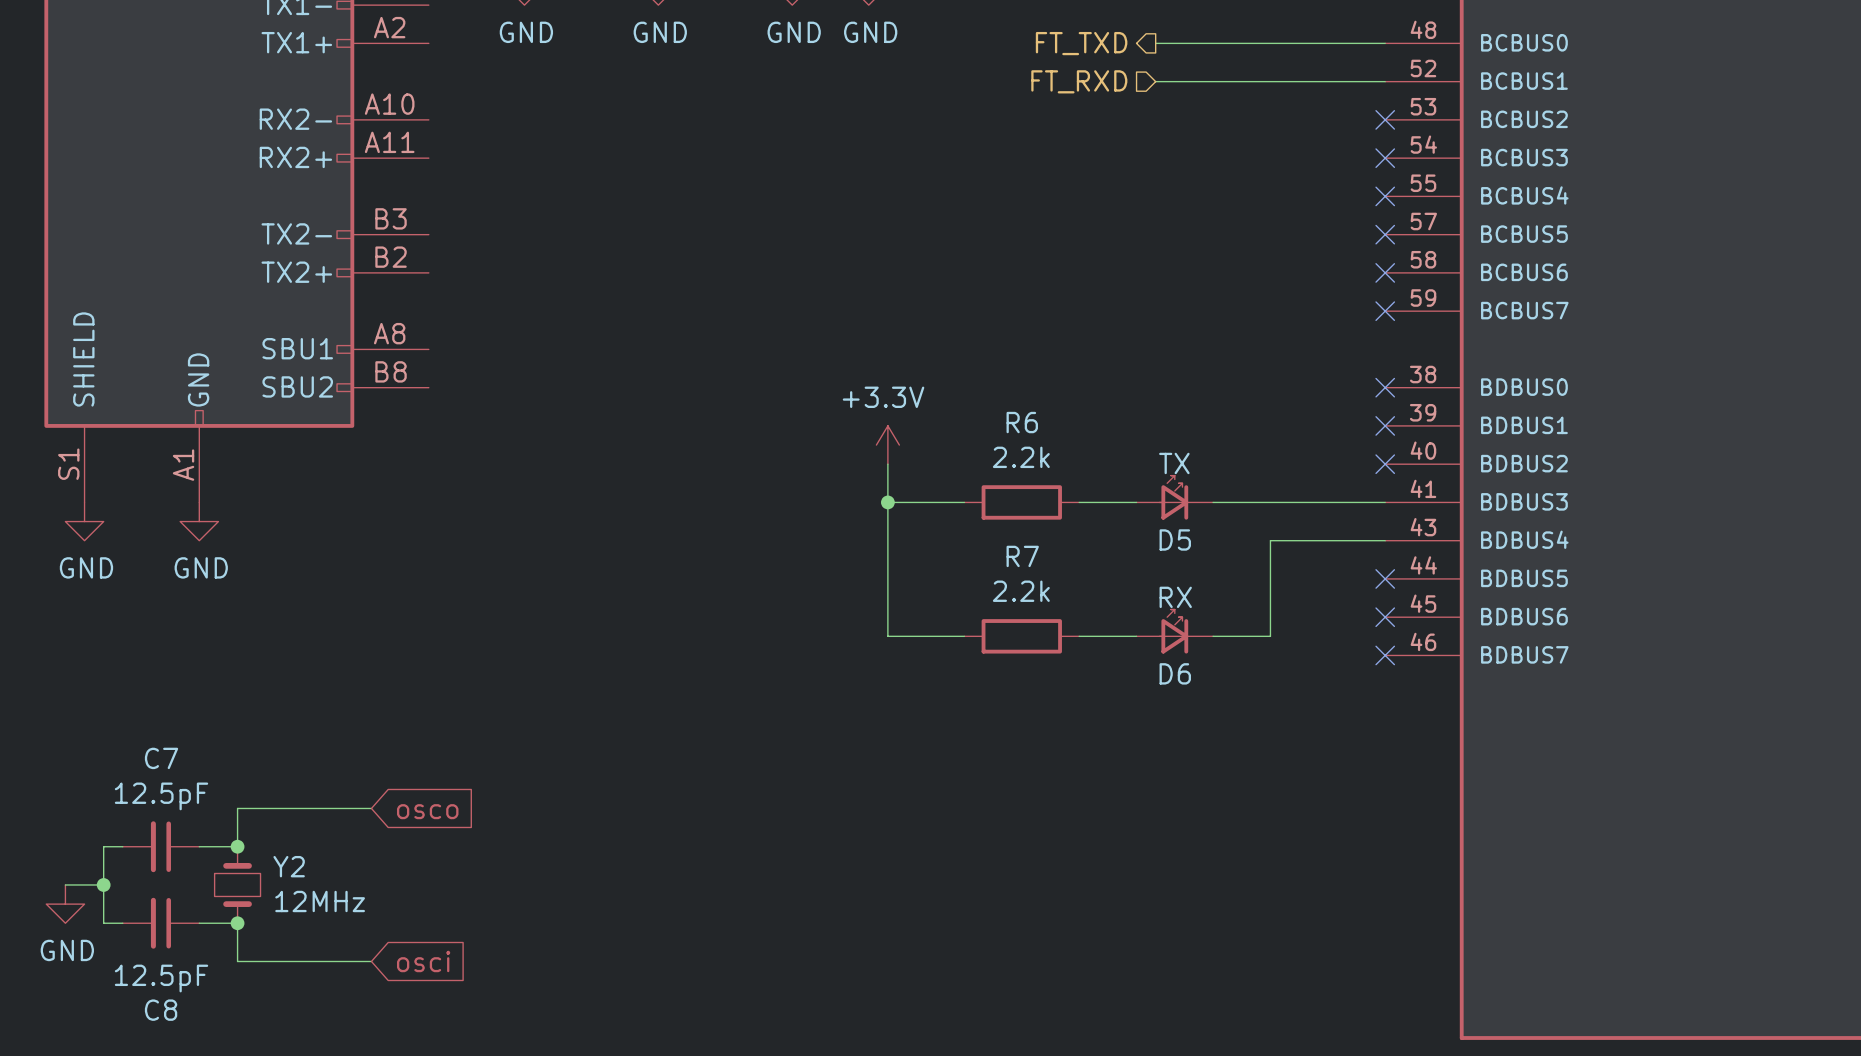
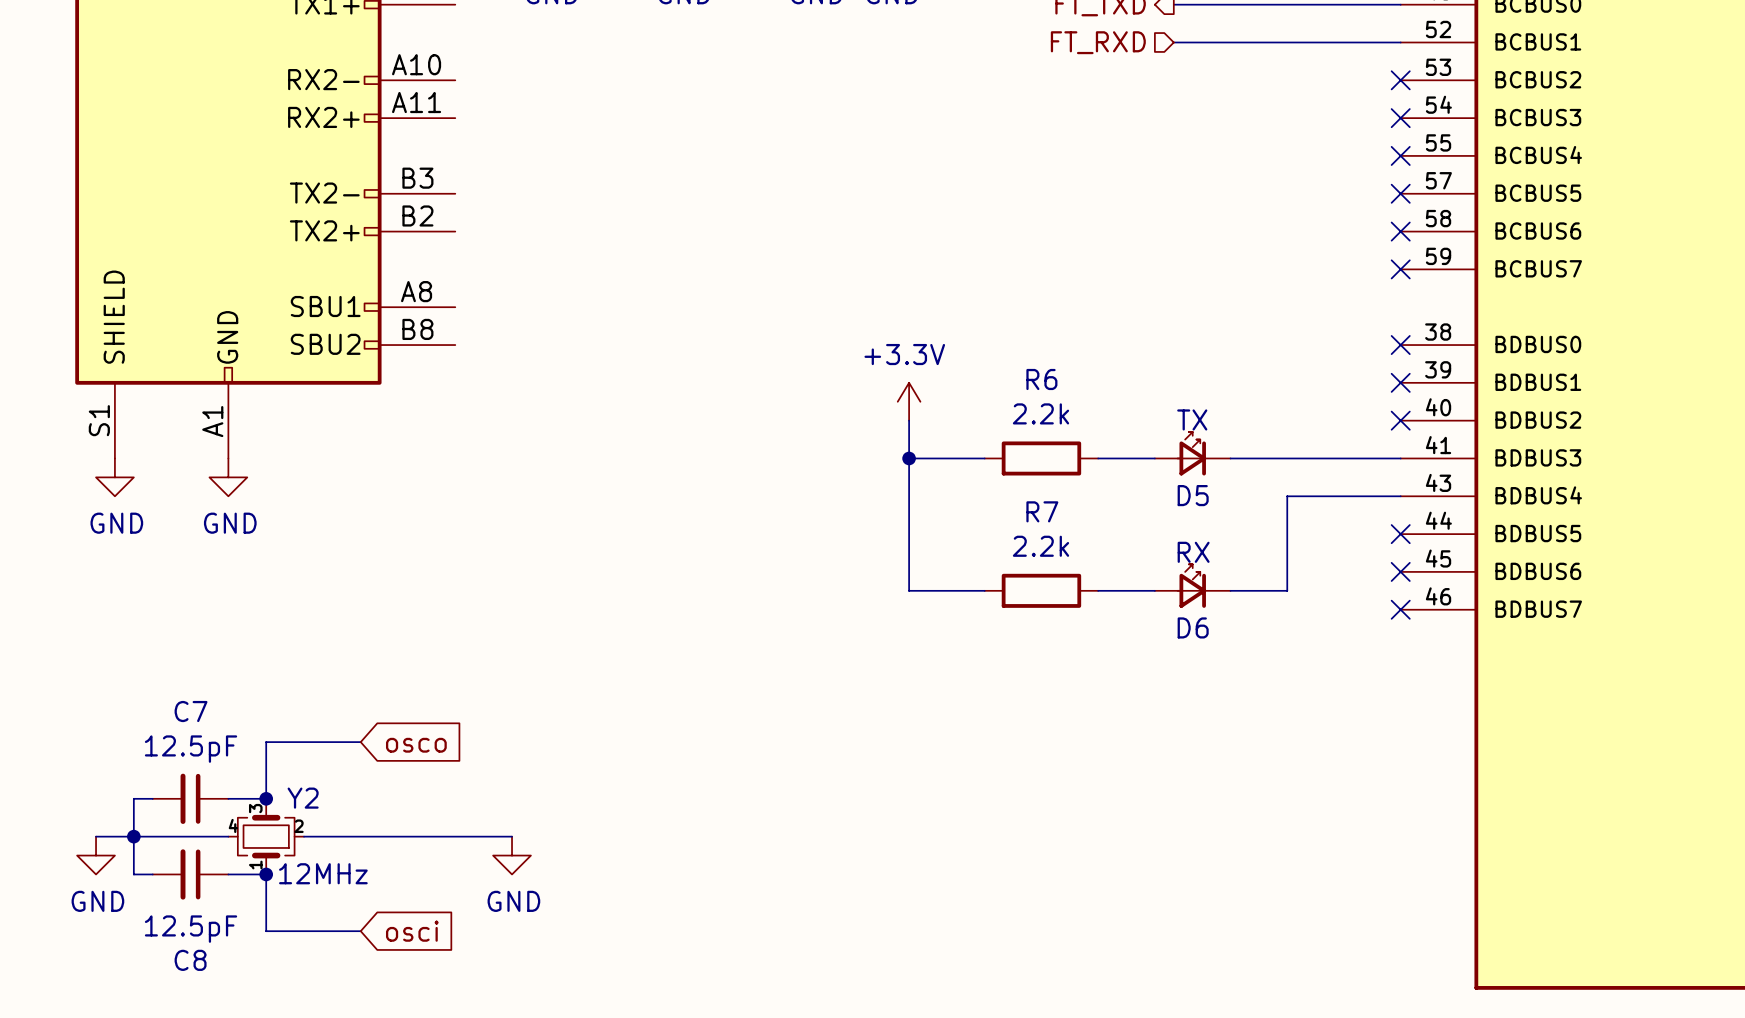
wire: (237, 808) (371, 808) -> (266, 761) (266, 742) (360, 742)
global label position: osco (427, 811) -> osco (416, 745)
Y2 symbol: [214, 846, 261, 924] -> [228, 798, 305, 875]
wire: none -> (133, 836) (228, 836)
wire: none -> (304, 836) (512, 836)
Y2 value position: 12MHz (320, 901) -> 12MHz (323, 873)
power symbol: none -> GND (512, 855)
wire: (237, 961) (371, 961) -> (266, 912) (266, 931) (360, 931)
global label position: osci (423, 961) -> osci (412, 931)

